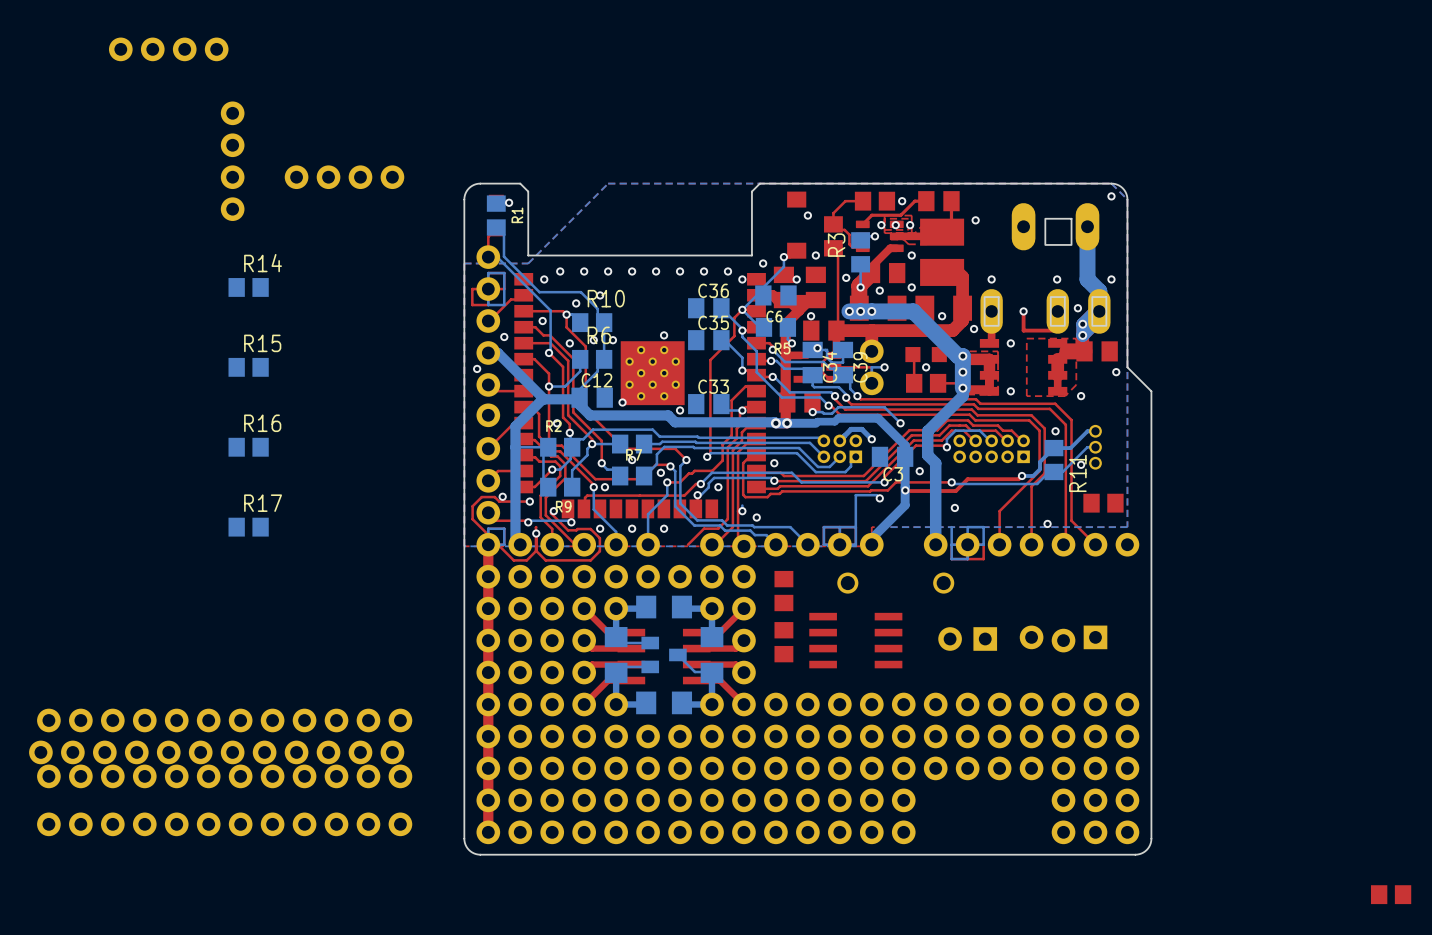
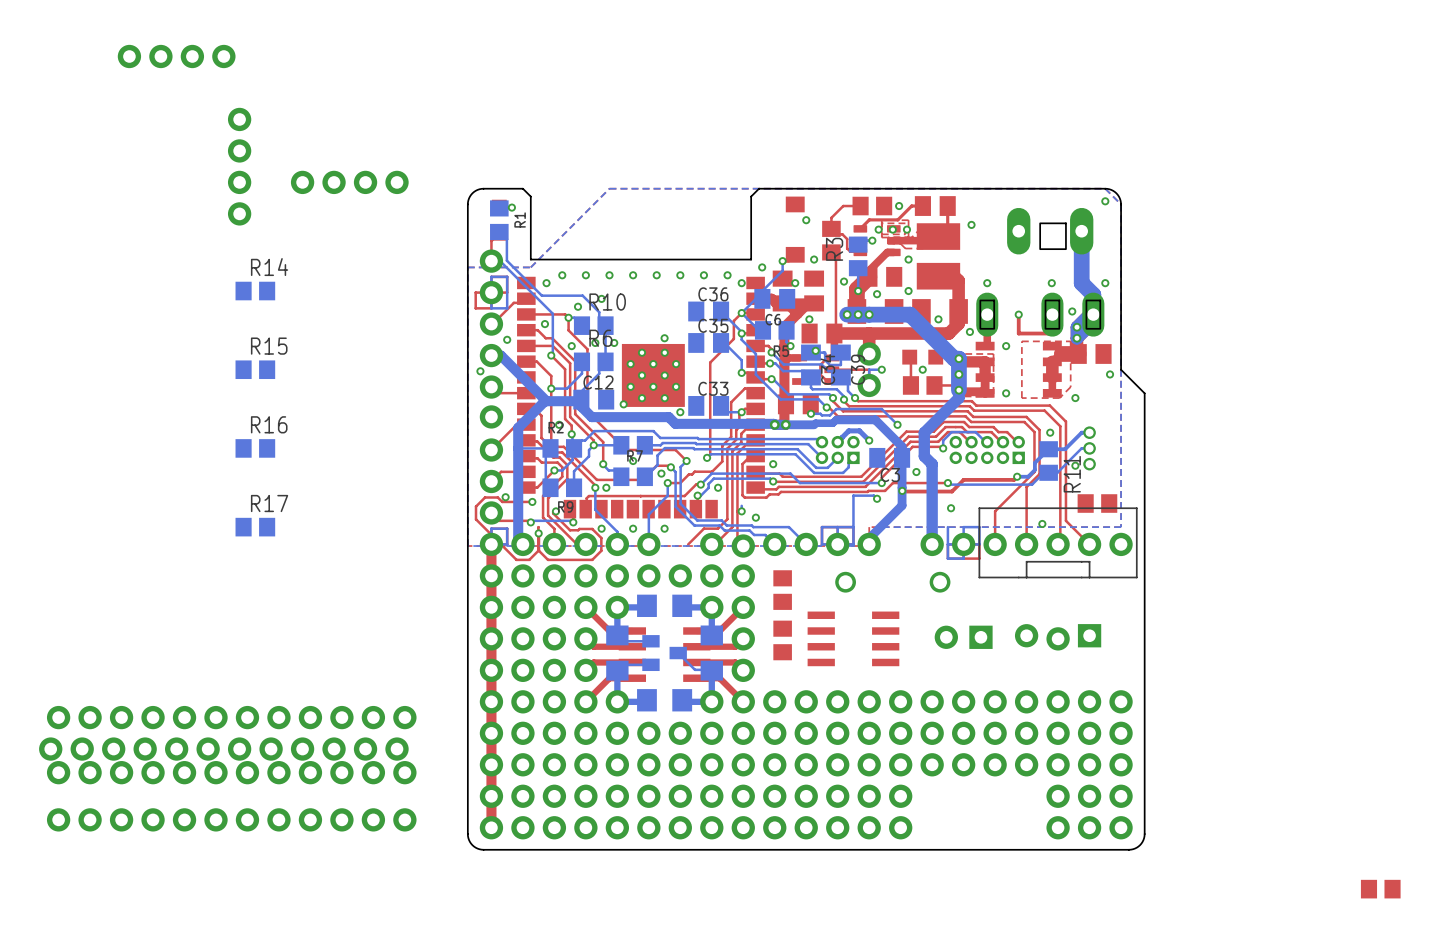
line: none -> (1136, 508) (1136, 577) (979, 577) (979, 508) (1136, 508)
line: none -> (1089, 577) (1089, 561) (1026, 561) (1026, 577)

